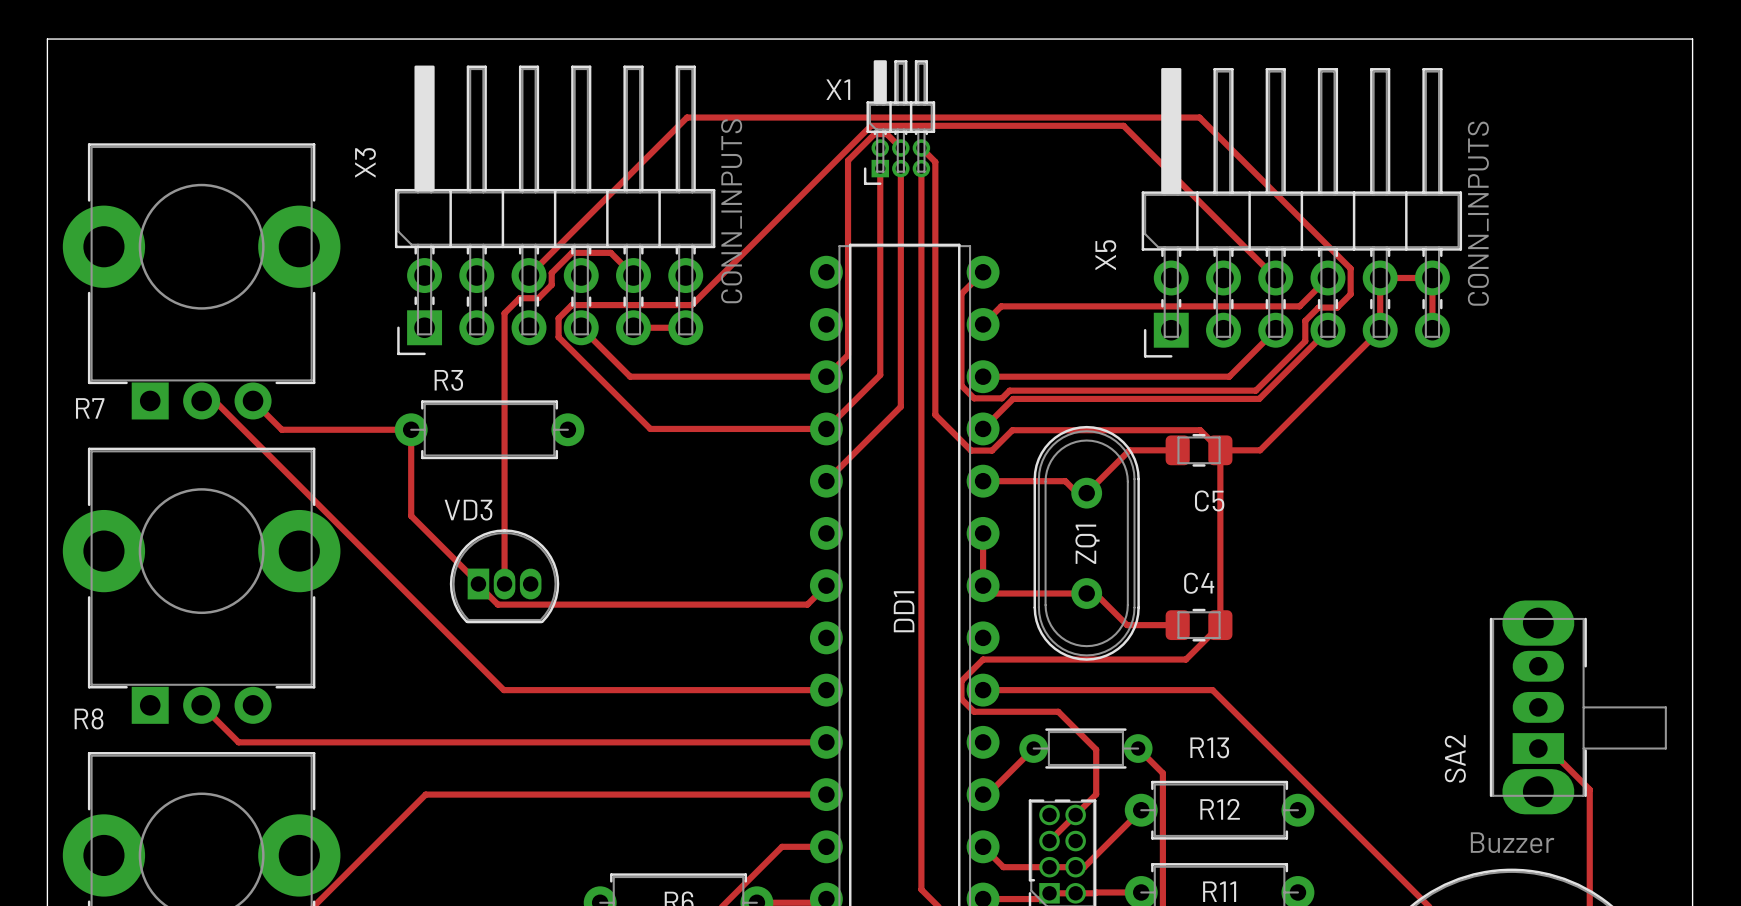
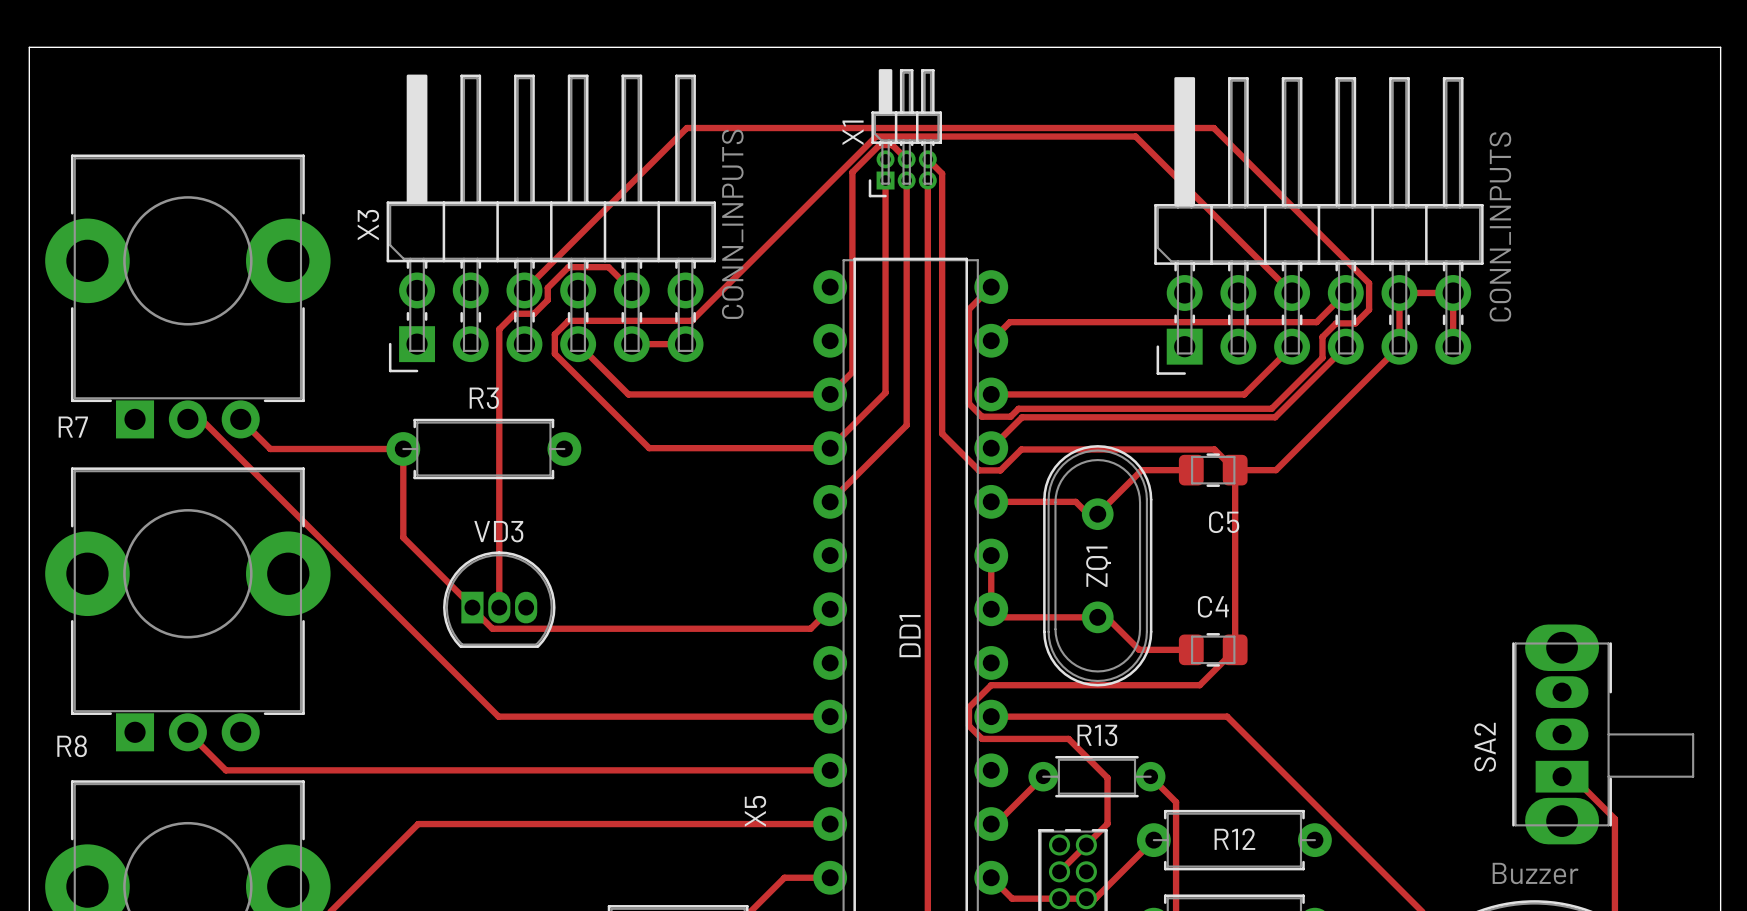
X1 name rotation: 0° (838, 89) -> 90° counterclockwise (853, 132)
X3 name position: X3 (365, 162) -> X3 (368, 225)
X5 name position: X5 (1105, 255) -> X5 (755, 811)
R3 name position: R3 (448, 380) -> R3 (484, 398)
VD3 name position: VD3 (468, 510) -> VD3 (498, 531)
R13 name position: R13 (1209, 747) -> R13 (1097, 735)
SA2 name position: SA2 (1455, 758) -> SA2 (1485, 747)

